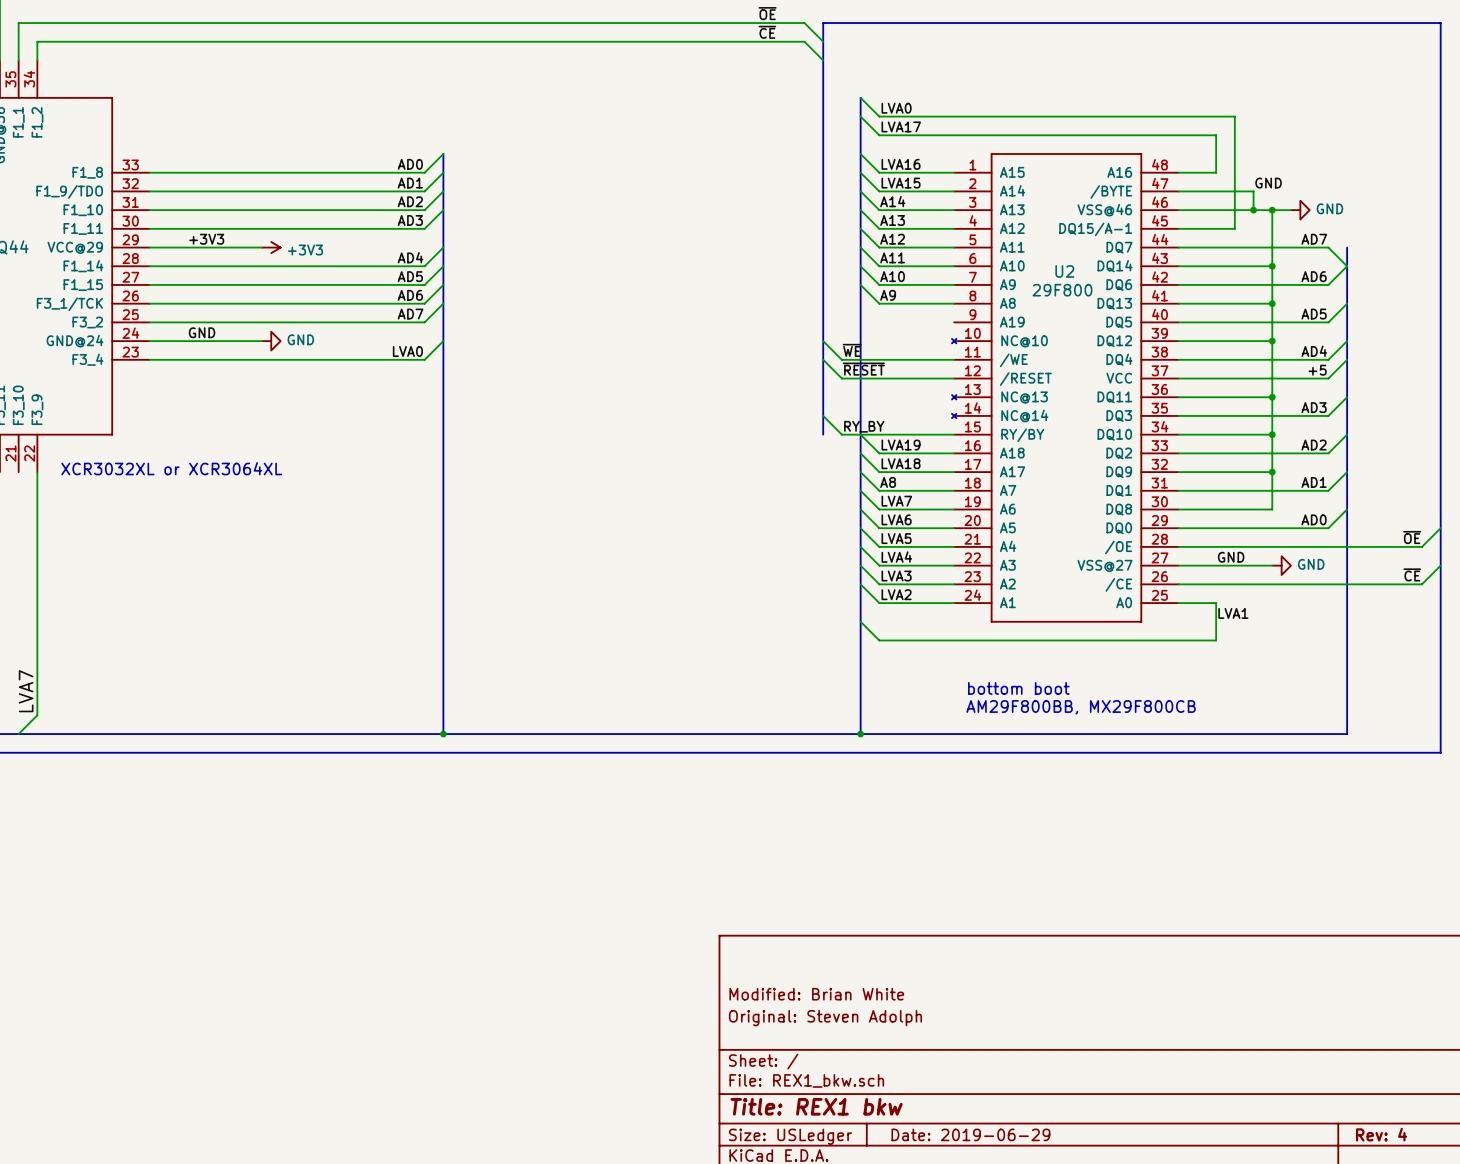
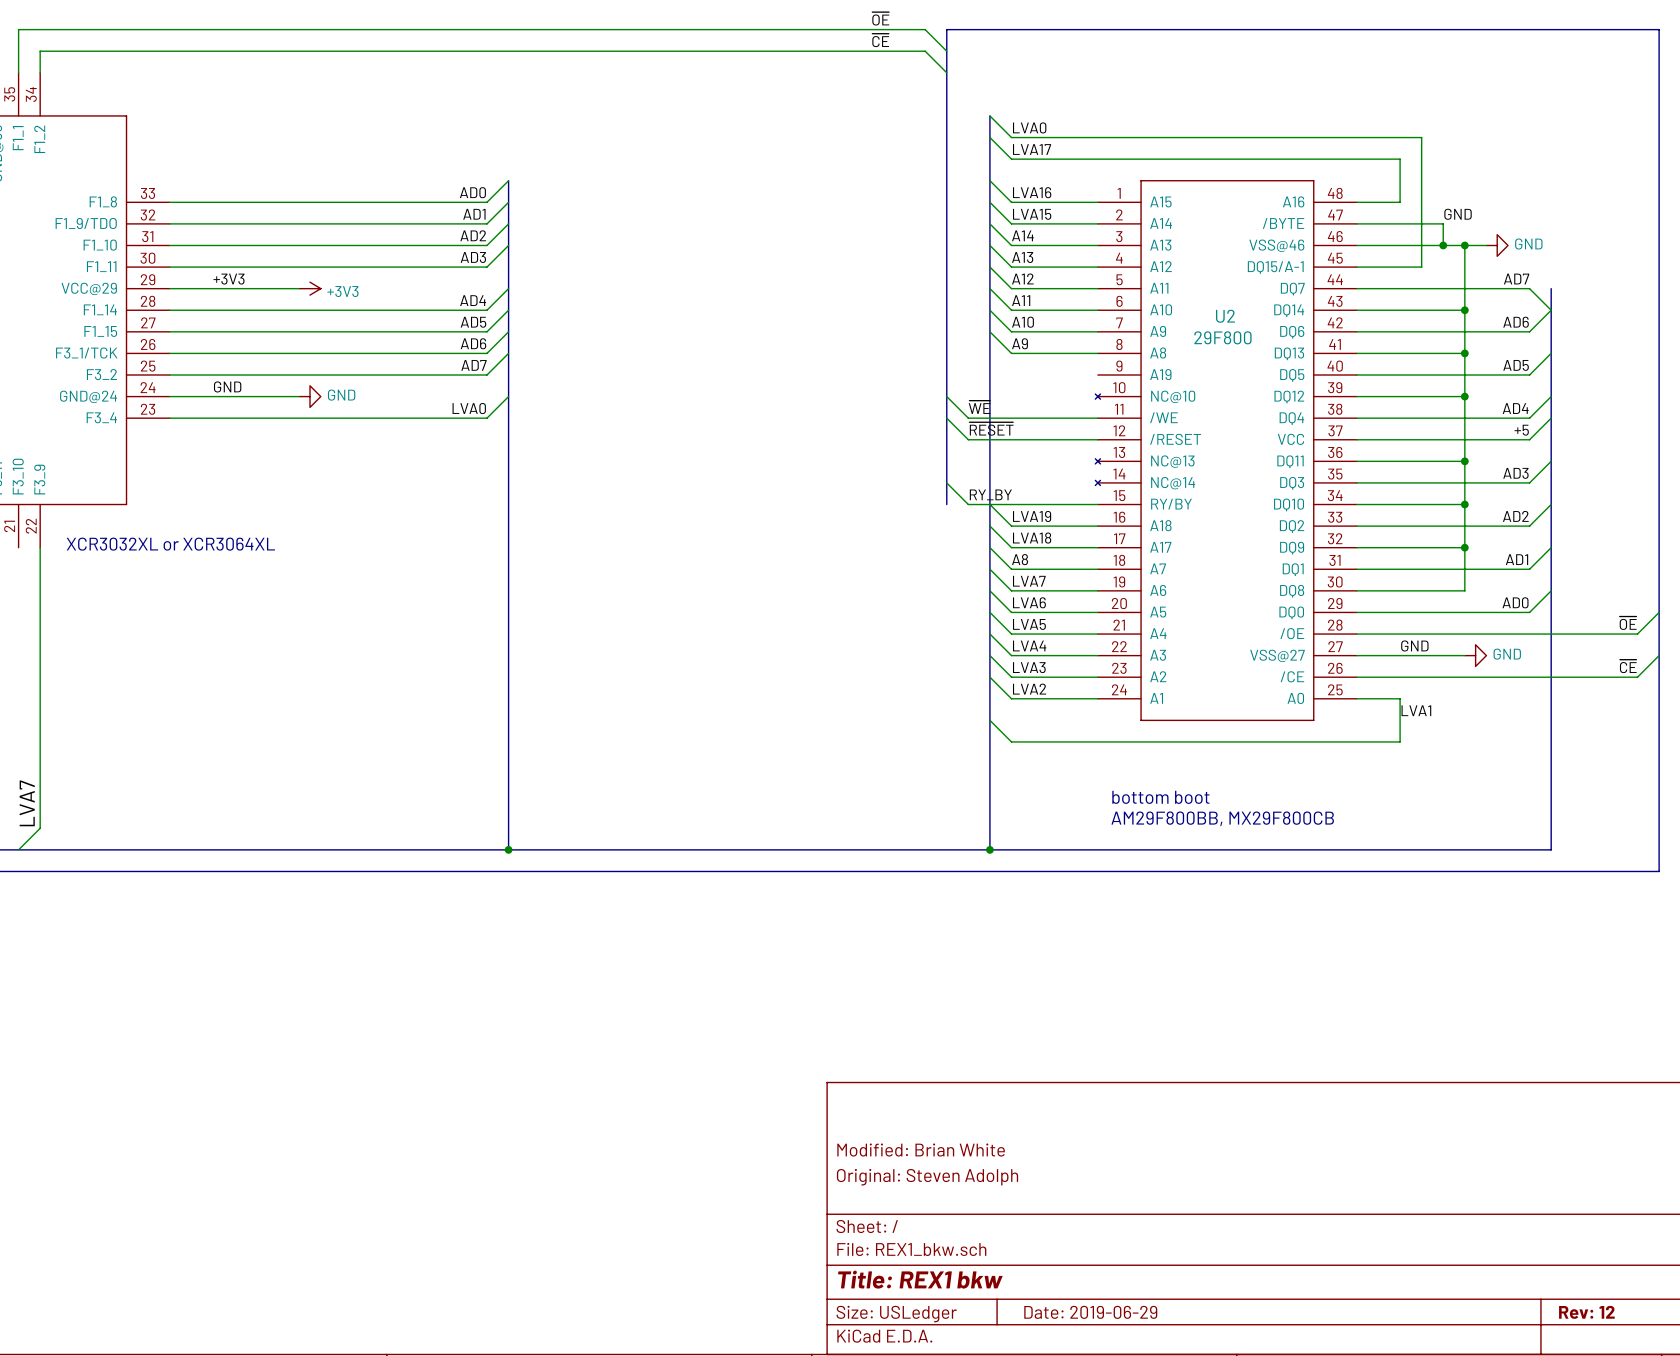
title block: Rev: 4 (1381, 1134) -> Rev: 12 (1586, 1312)

